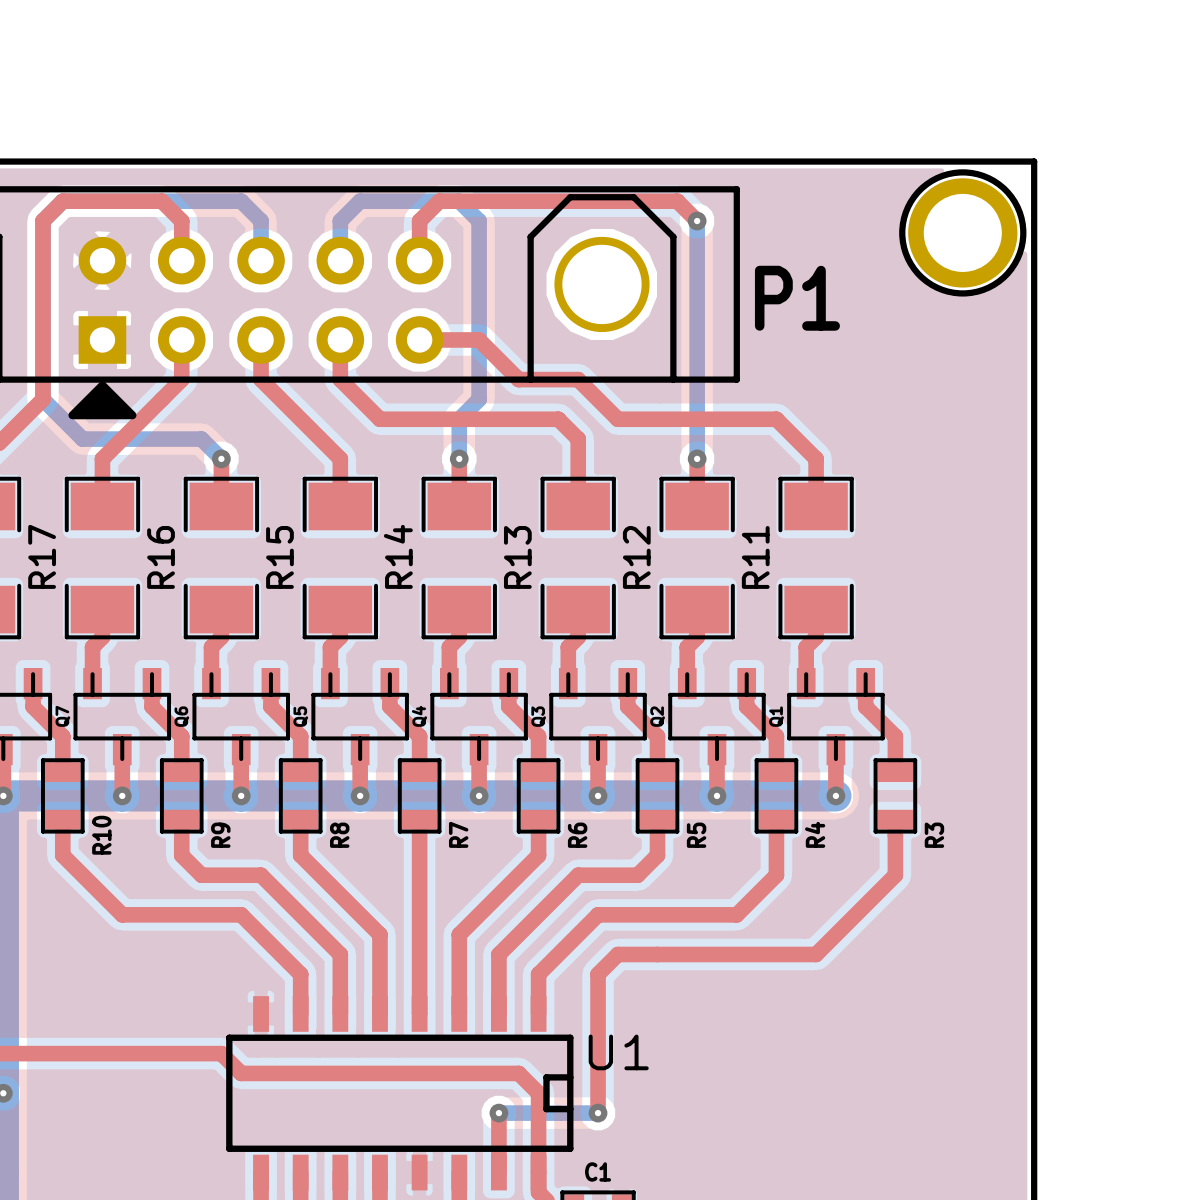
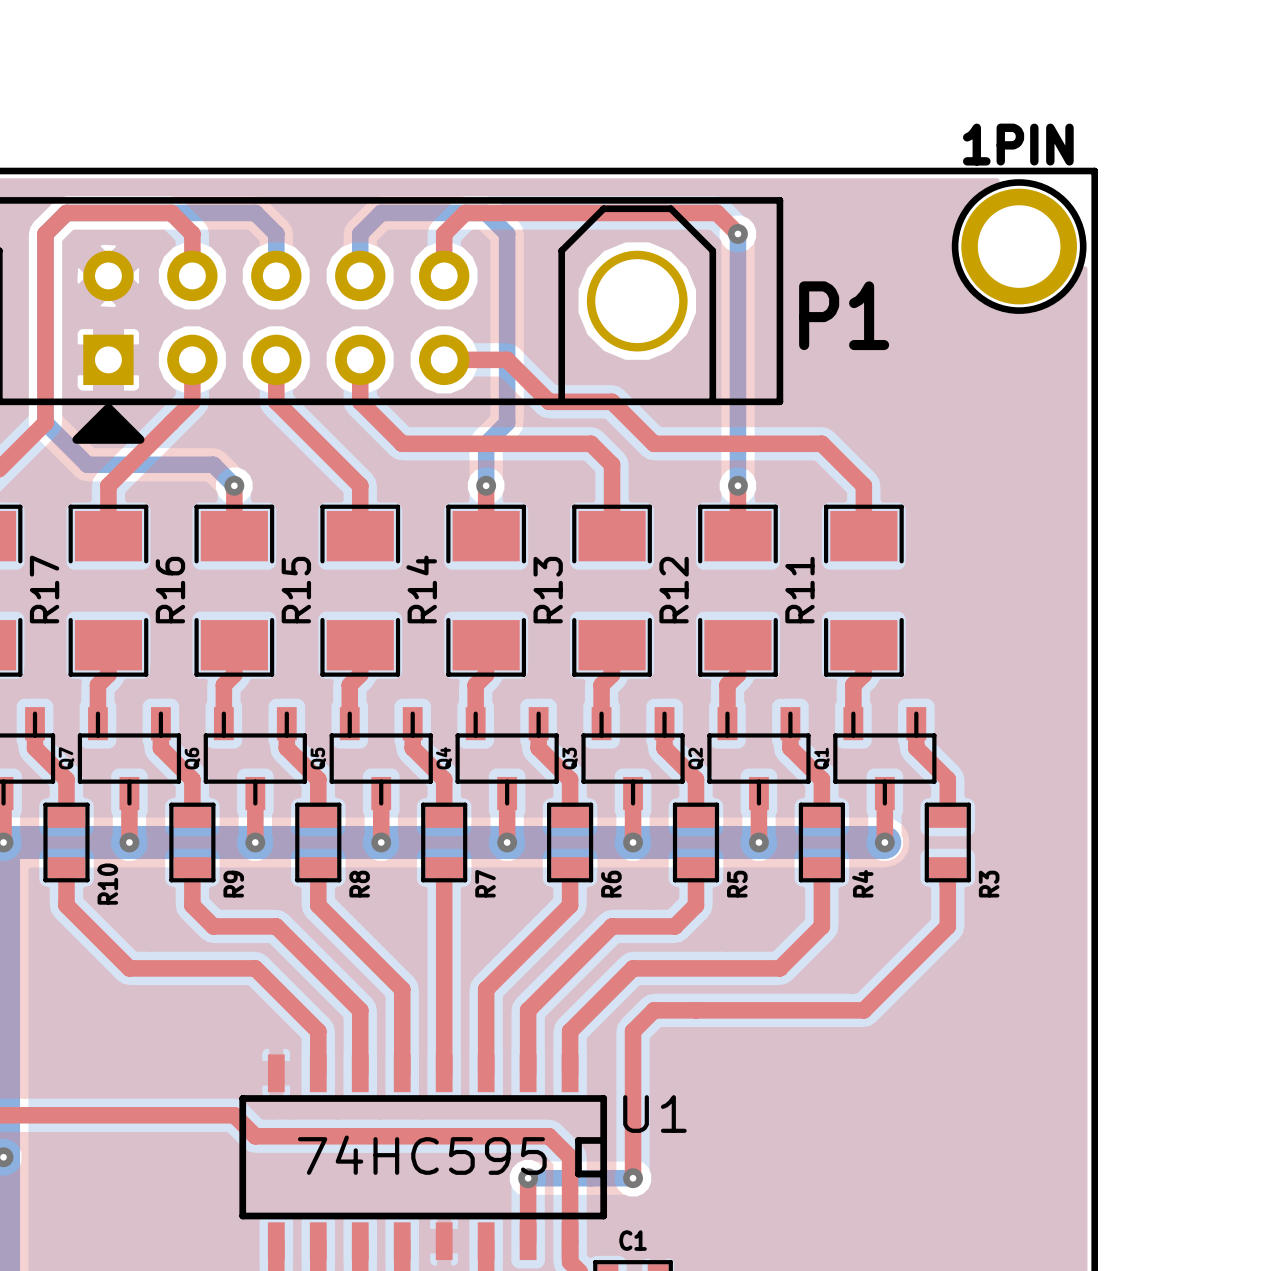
1PIN name: none -> 1PIN (1018, 144)
U1 value: none -> 74HC595 (422, 1155)

